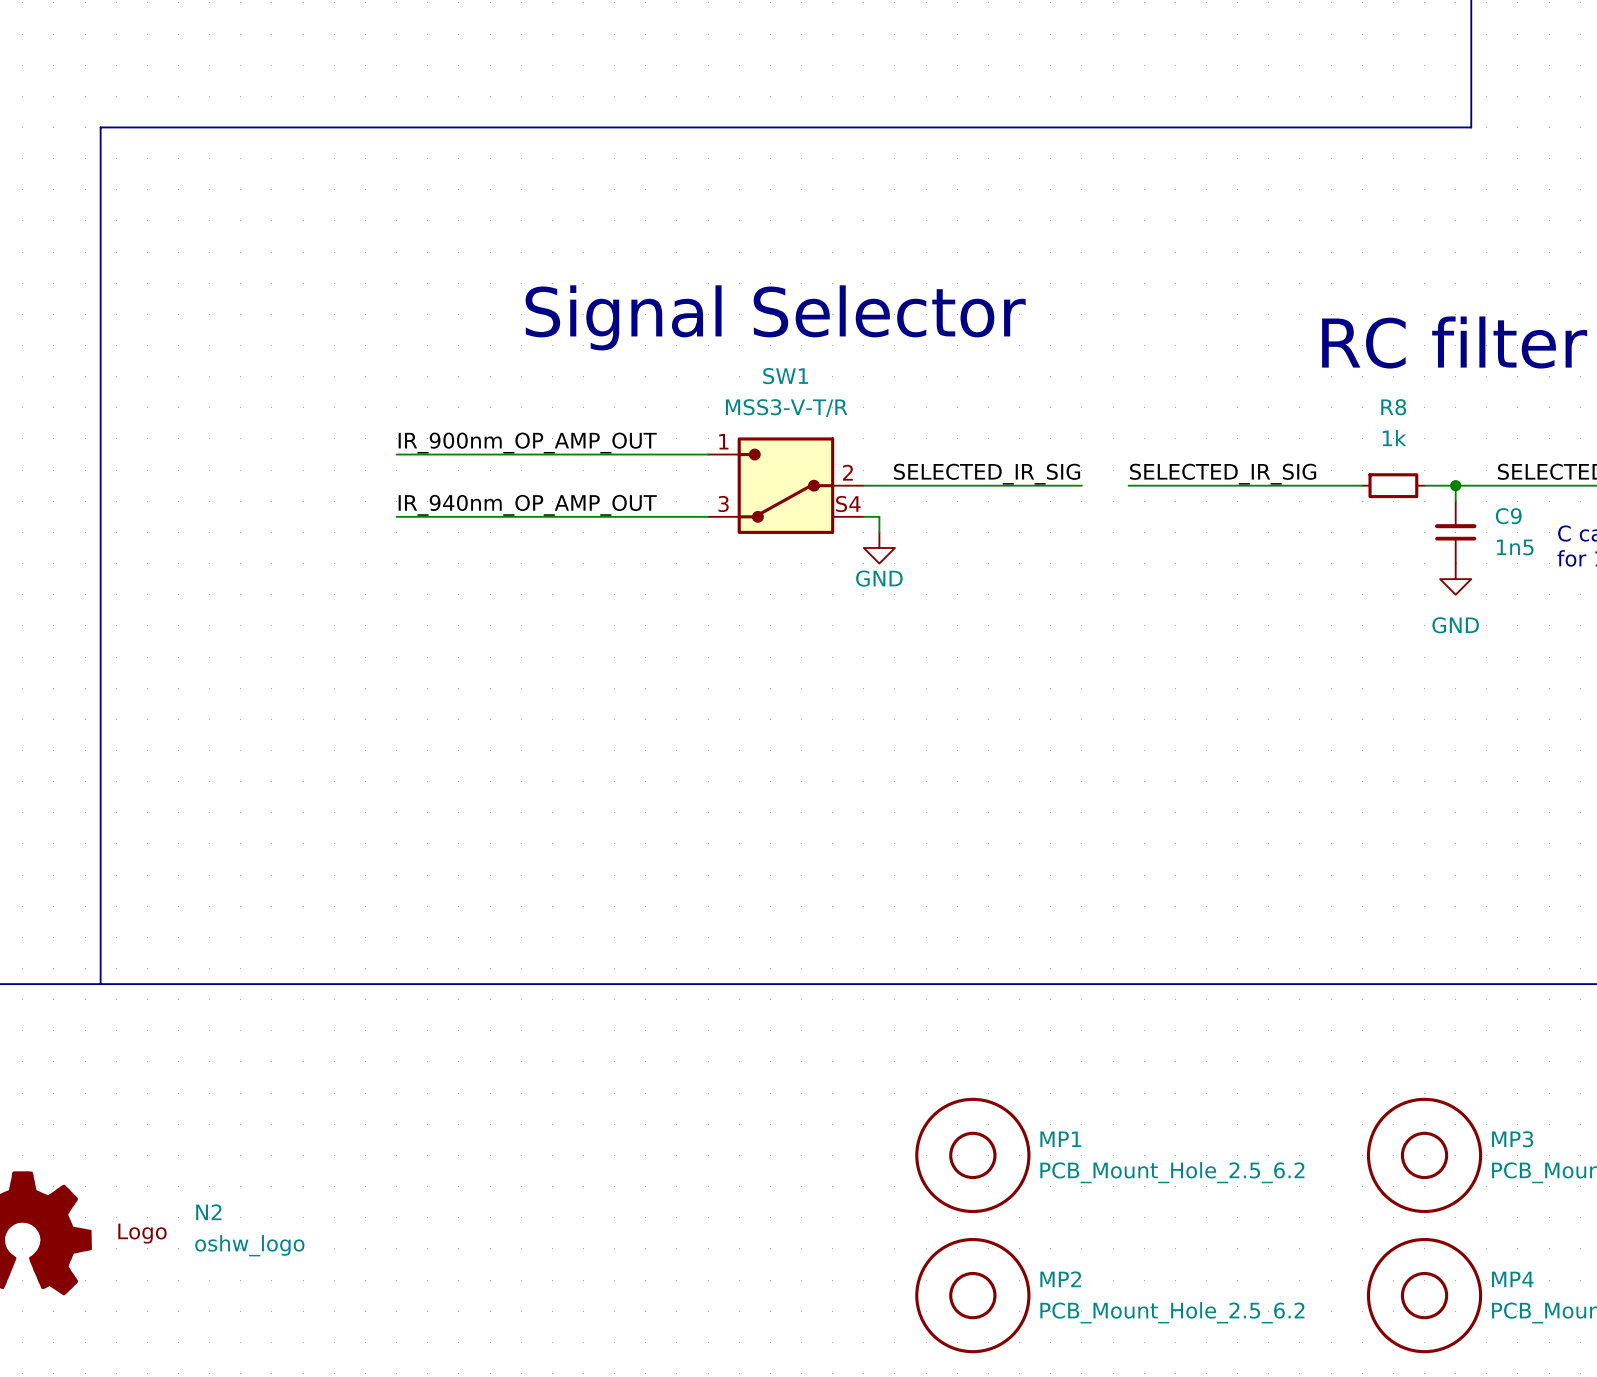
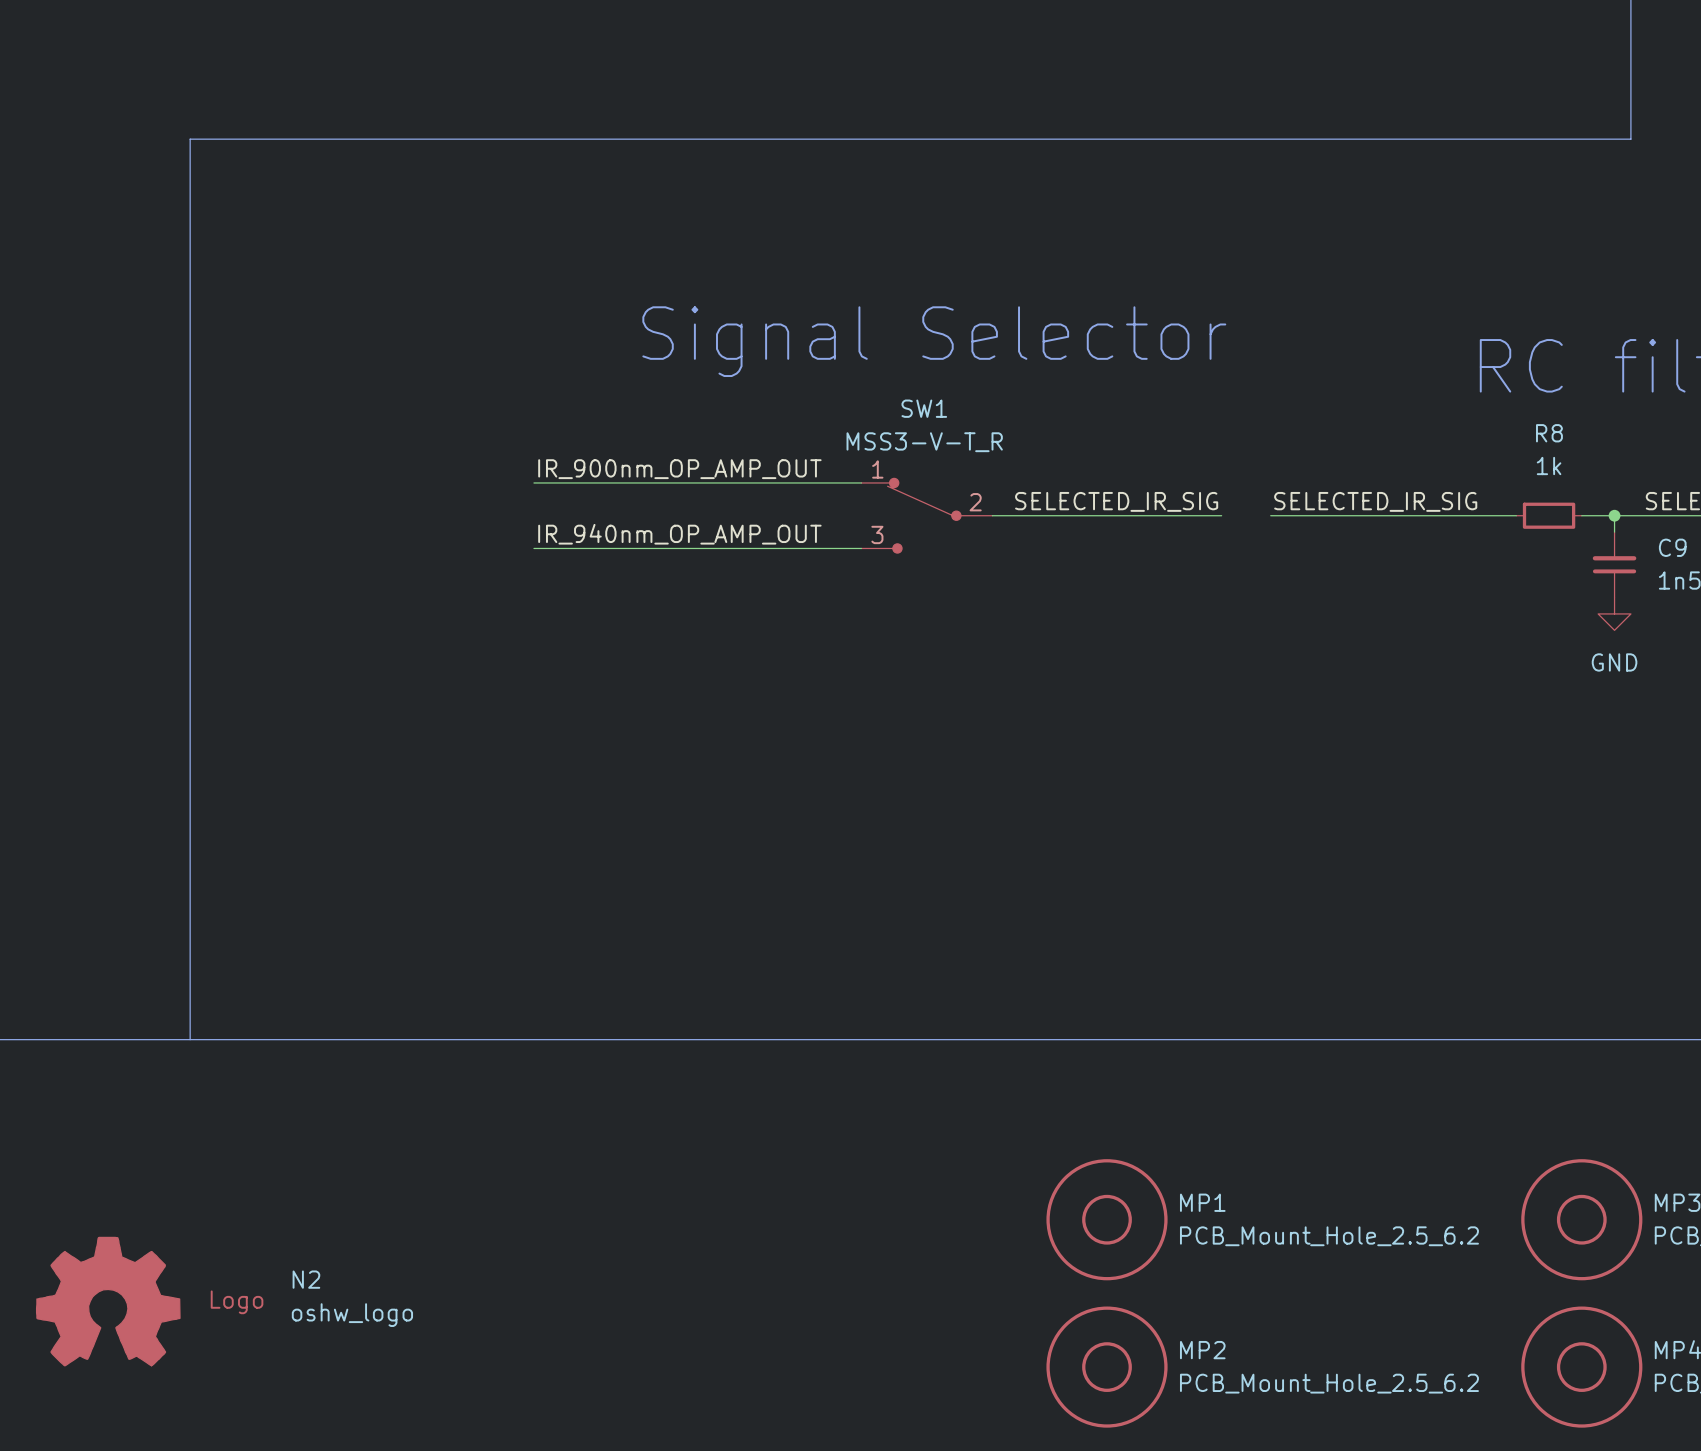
SW1 text: MSS3-V-T/R (786, 408) -> none
SW1 value: none -> MSS3-V-T_R (924, 442)
SW1 symbol: [708, 437, 864, 534] -> [861, 478, 993, 554]
label position: IR_900nm_OP_AMP_OUT (527, 443) -> IR_900nm_OP_AMP_OUT (679, 469)
wire: (396, 454) (427, 454) -> none
label position: IR_940nm_OP_AMP_OUT (527, 505) -> IR_940nm_OP_AMP_OUT (679, 534)
wire: (396, 516) (427, 516) -> none
wire: (863, 516) (879, 516) (879, 532) -> none
power symbol: GND (879, 547) -> none

